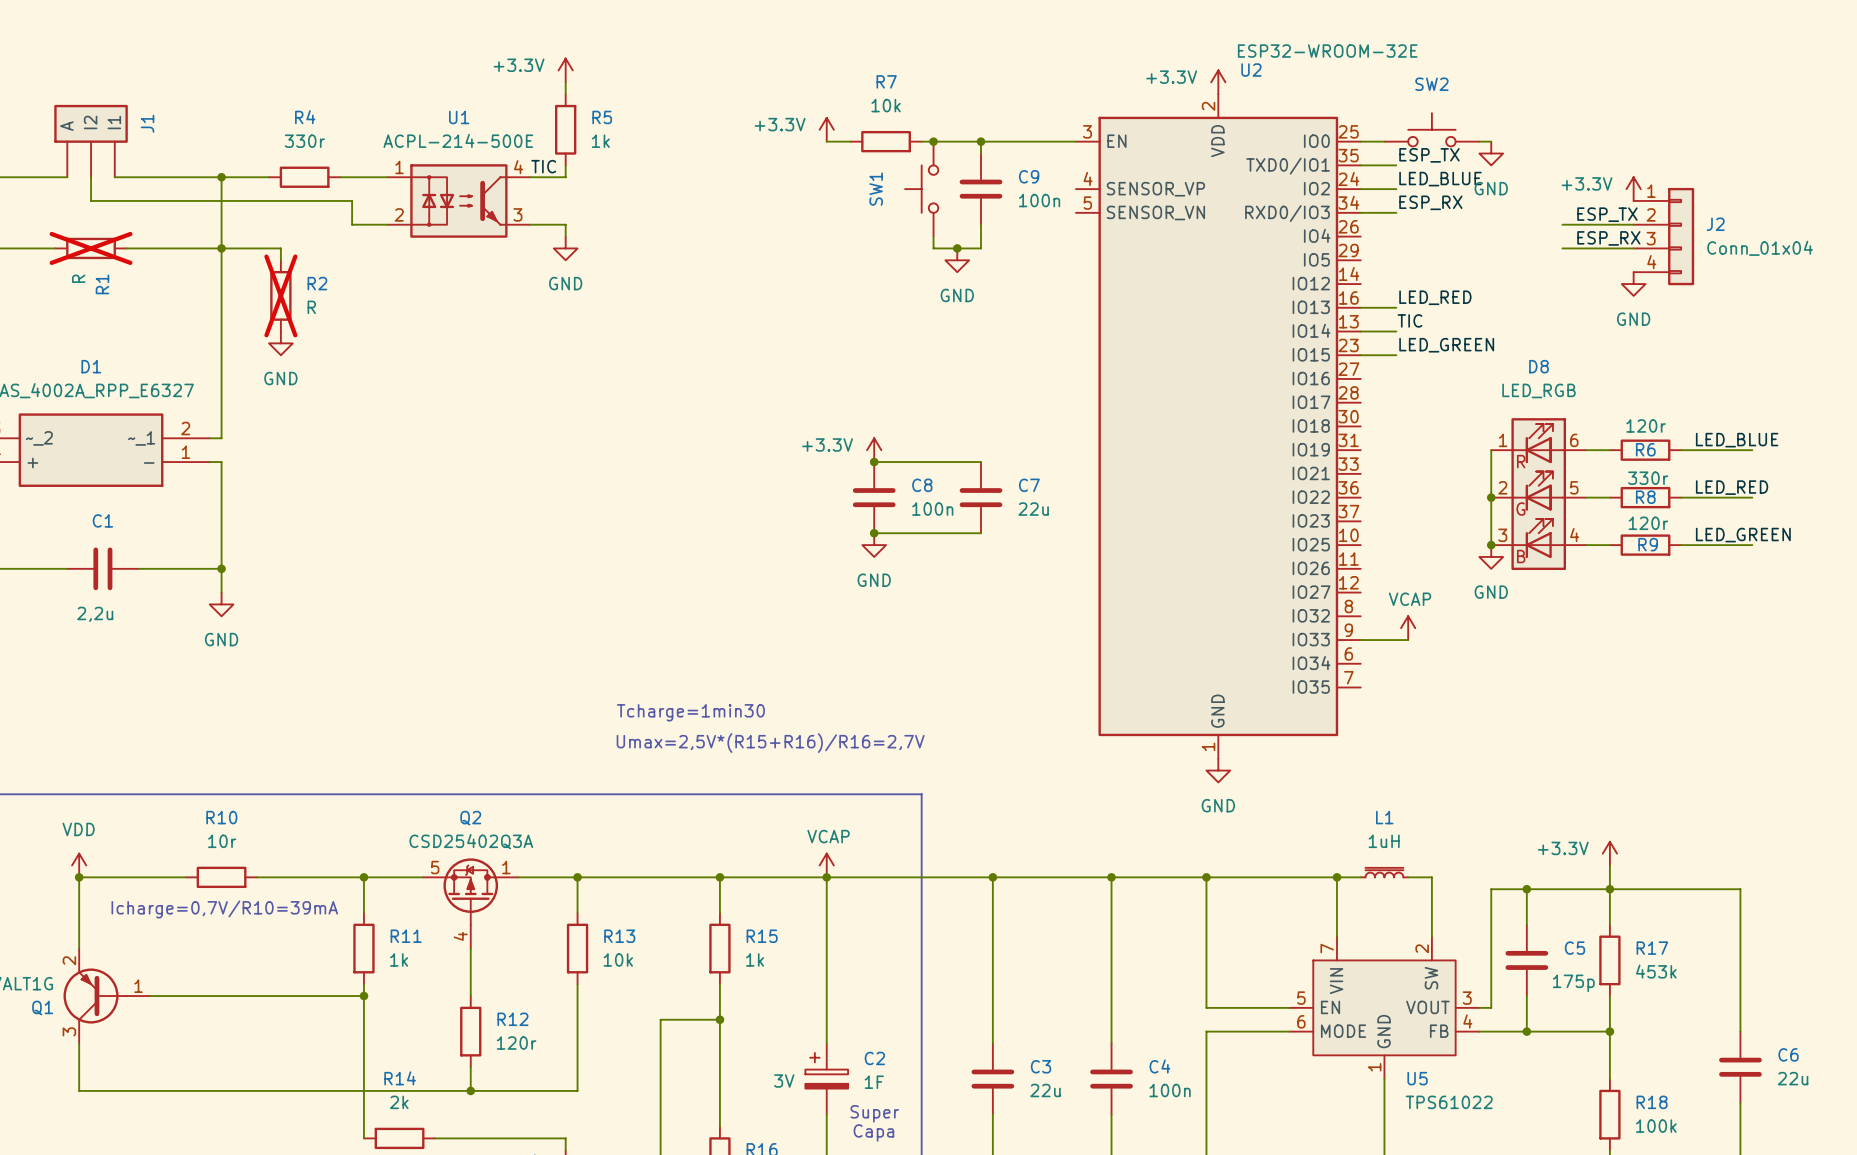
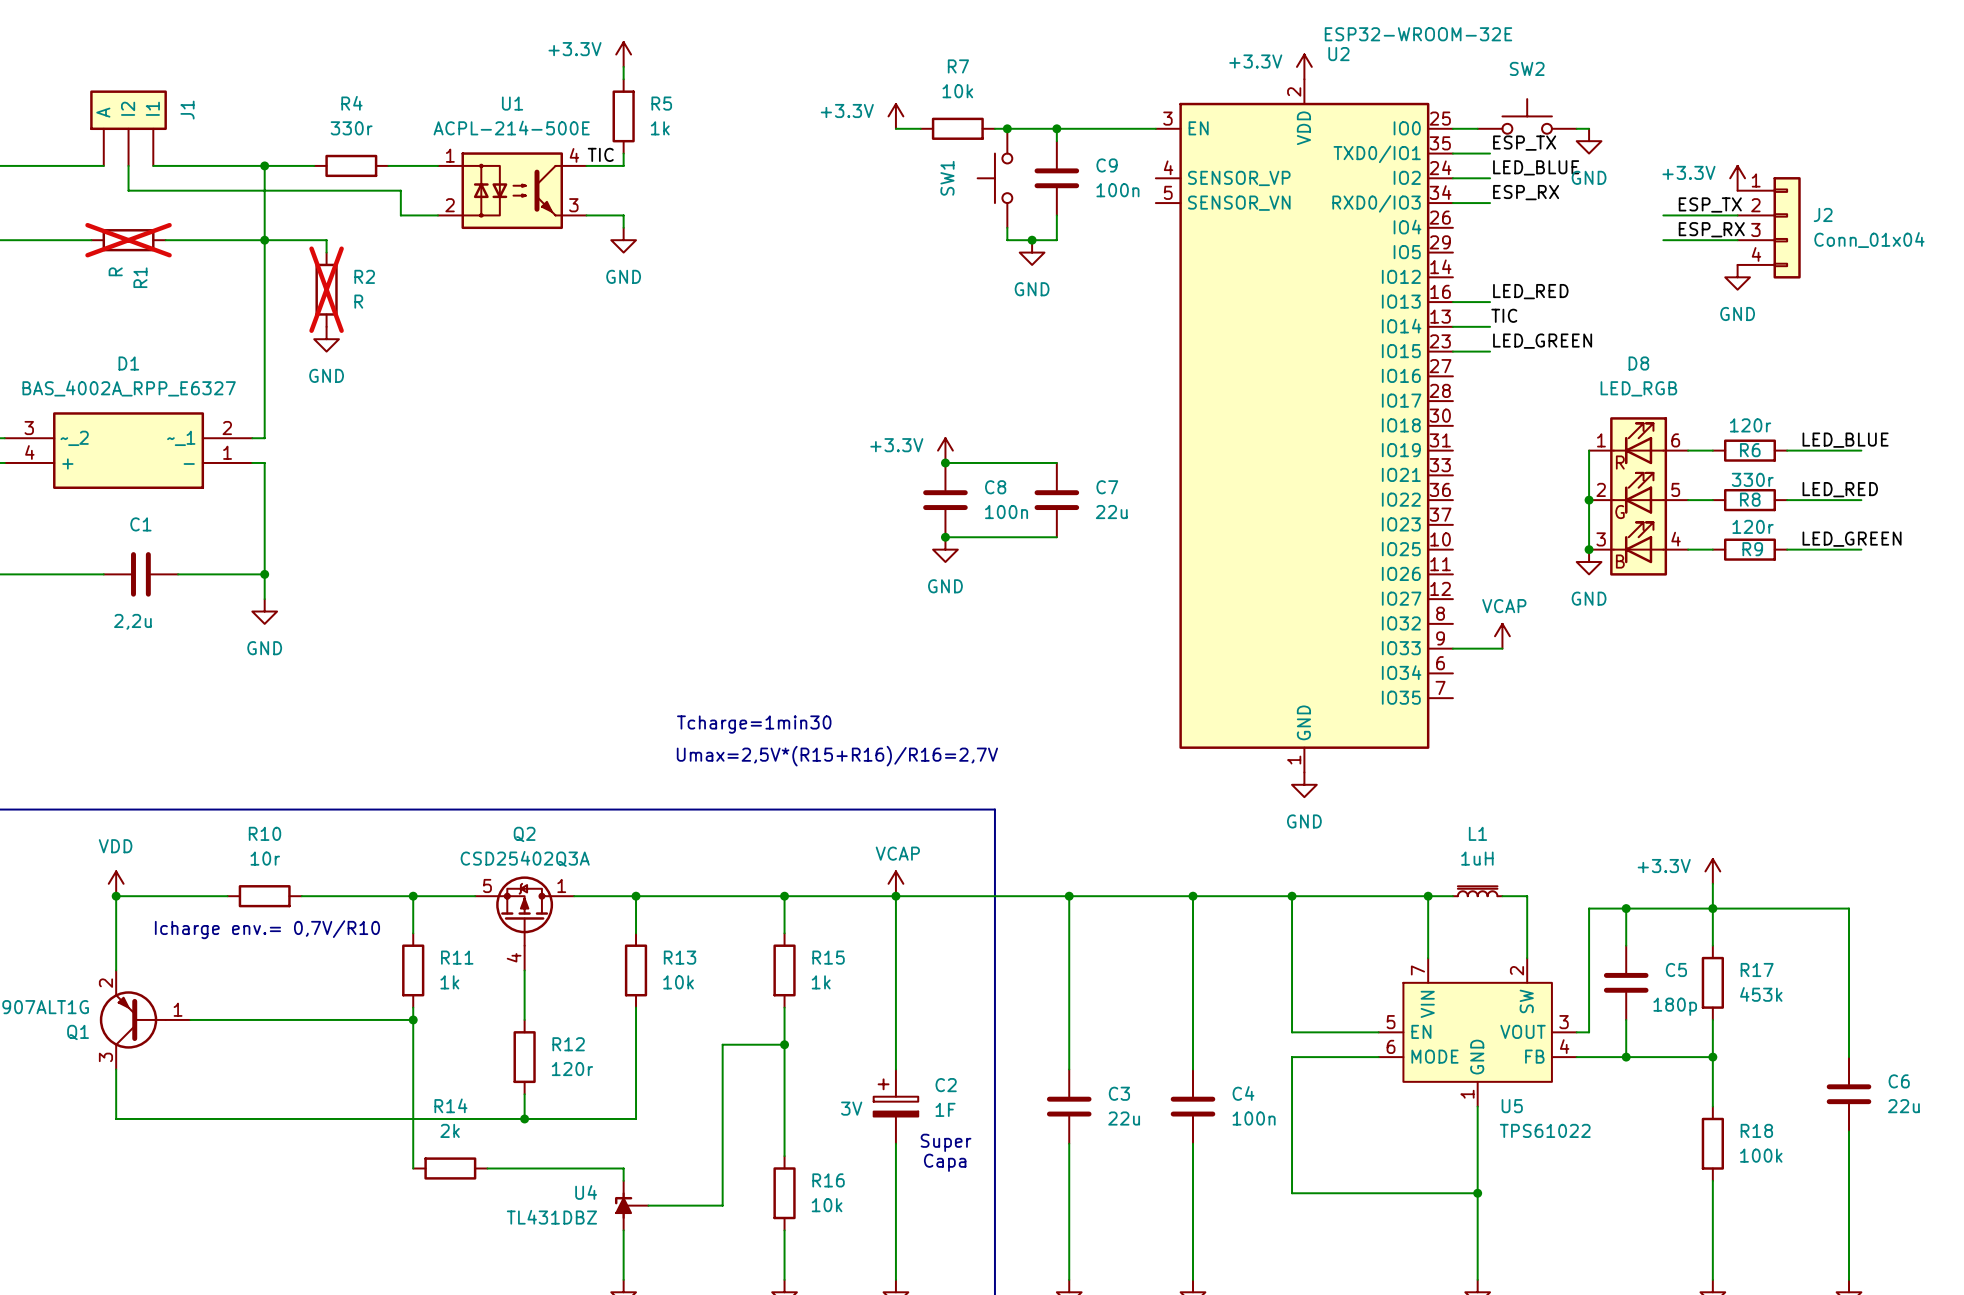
text: Icharge=0,7V/R10=39mA (224, 909) -> Icharge env.= 0,7V/R10 (267, 929)
C5 value: 175p (1573, 983) -> 180p (1675, 1006)

